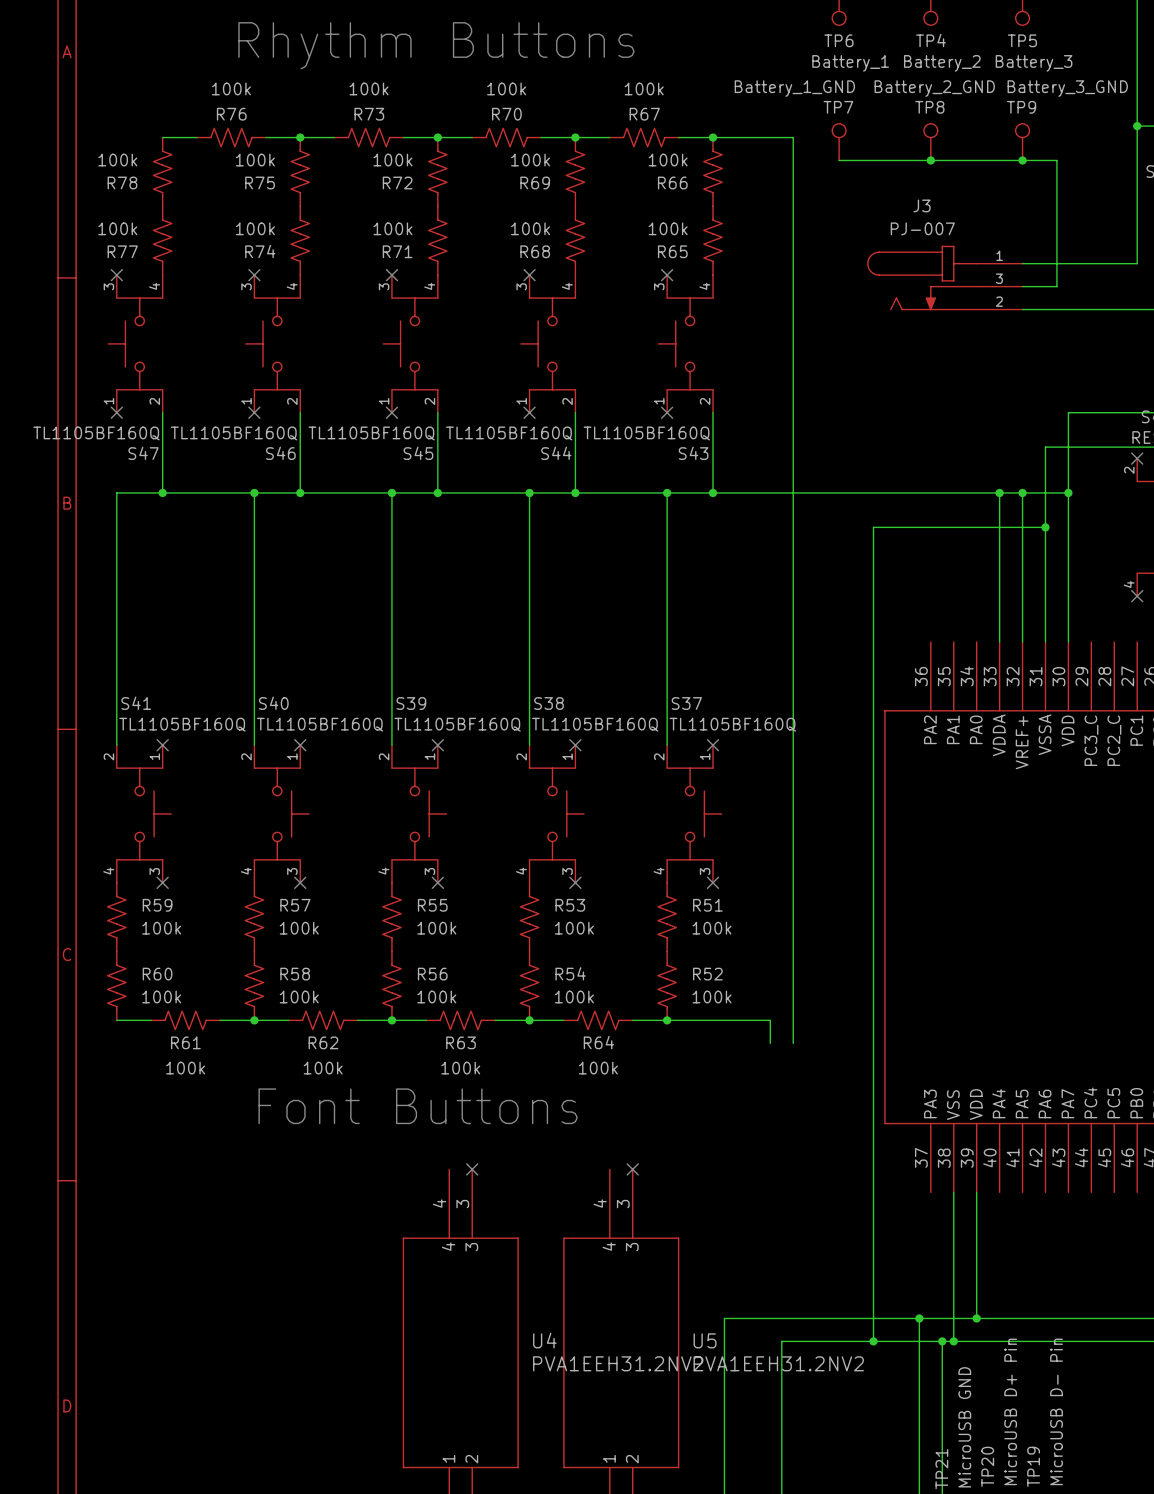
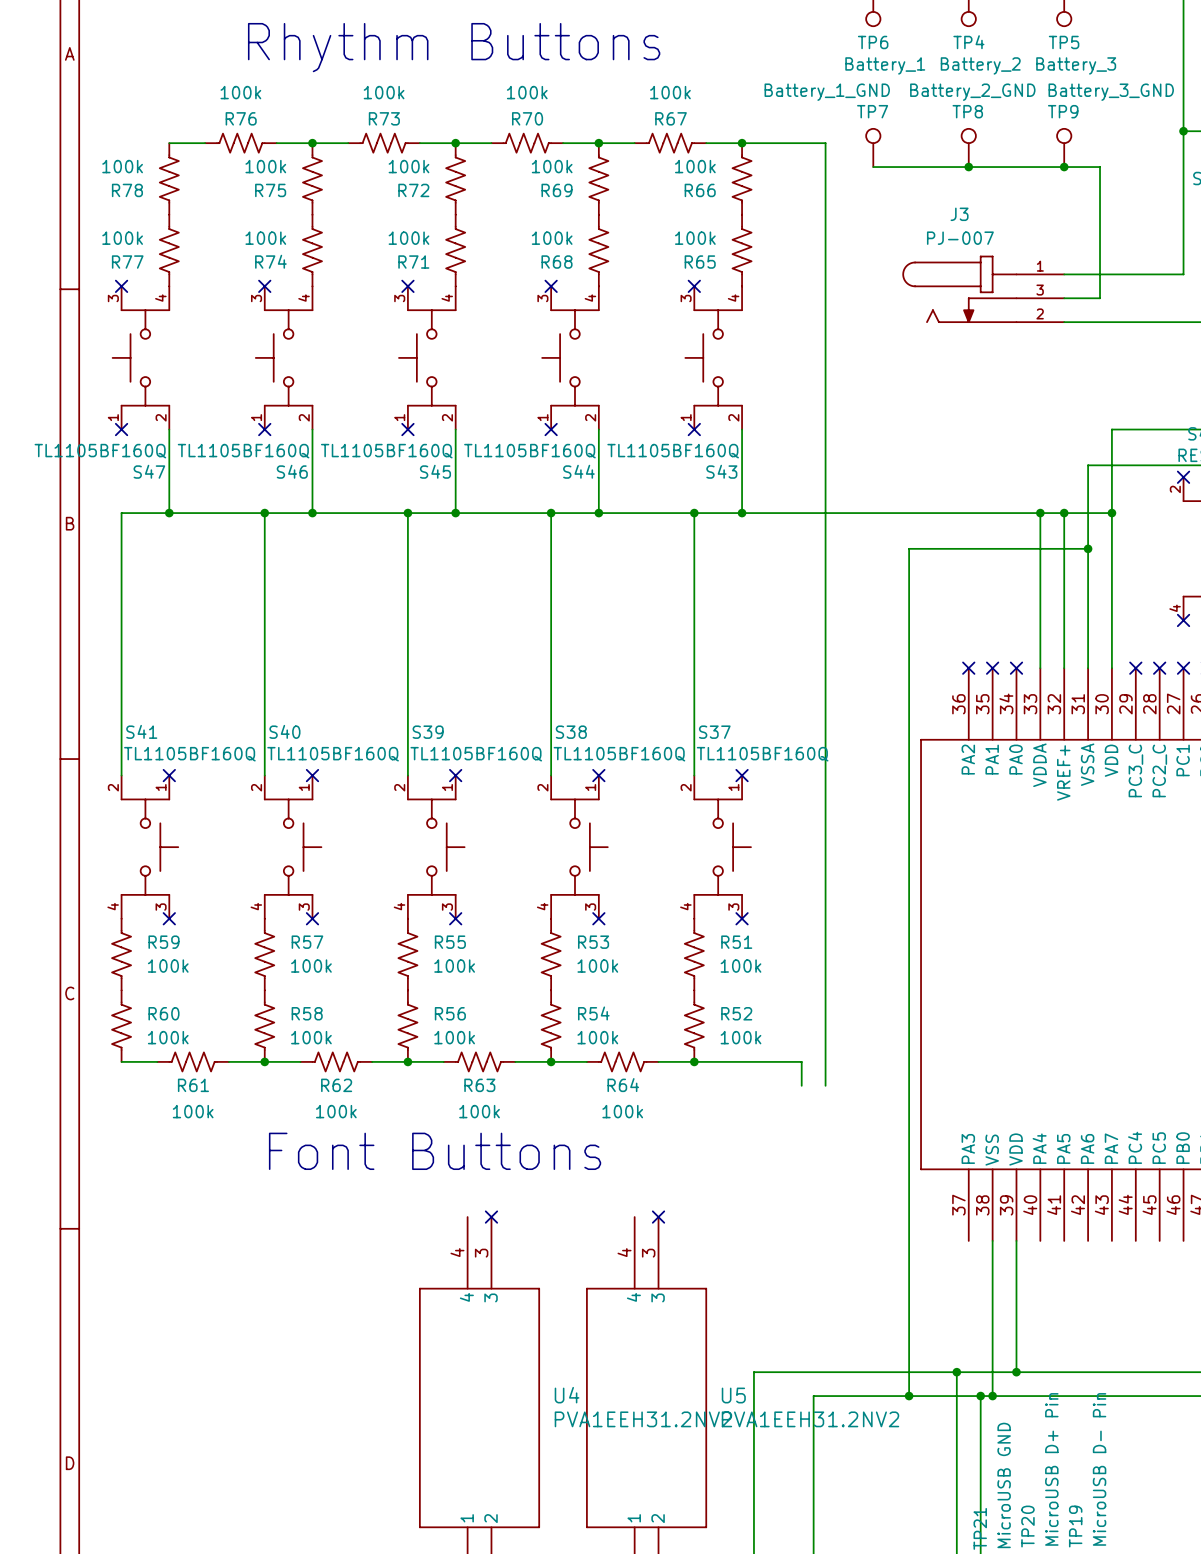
no-connect mark: none -> (968, 668)
no-connect mark: none -> (992, 668)
no-connect mark: none -> (1016, 668)
no-connect mark: none -> (1135, 668)
no-connect mark: none -> (1159, 668)
no-connect mark: none -> (1183, 668)

